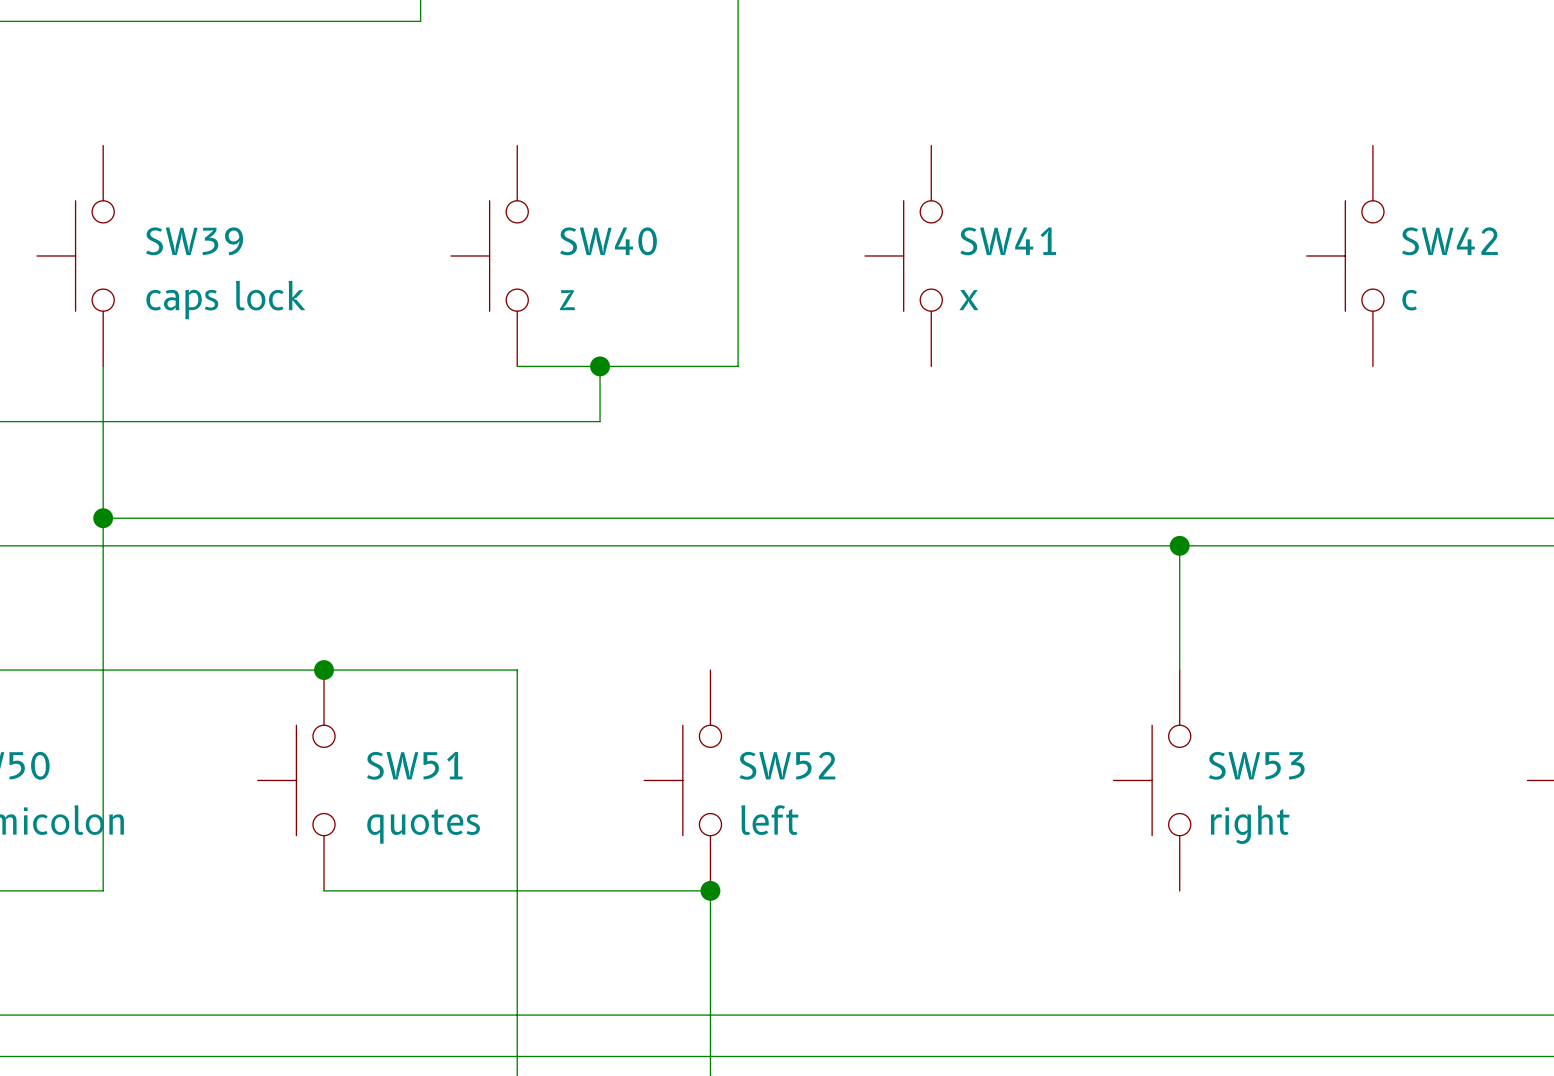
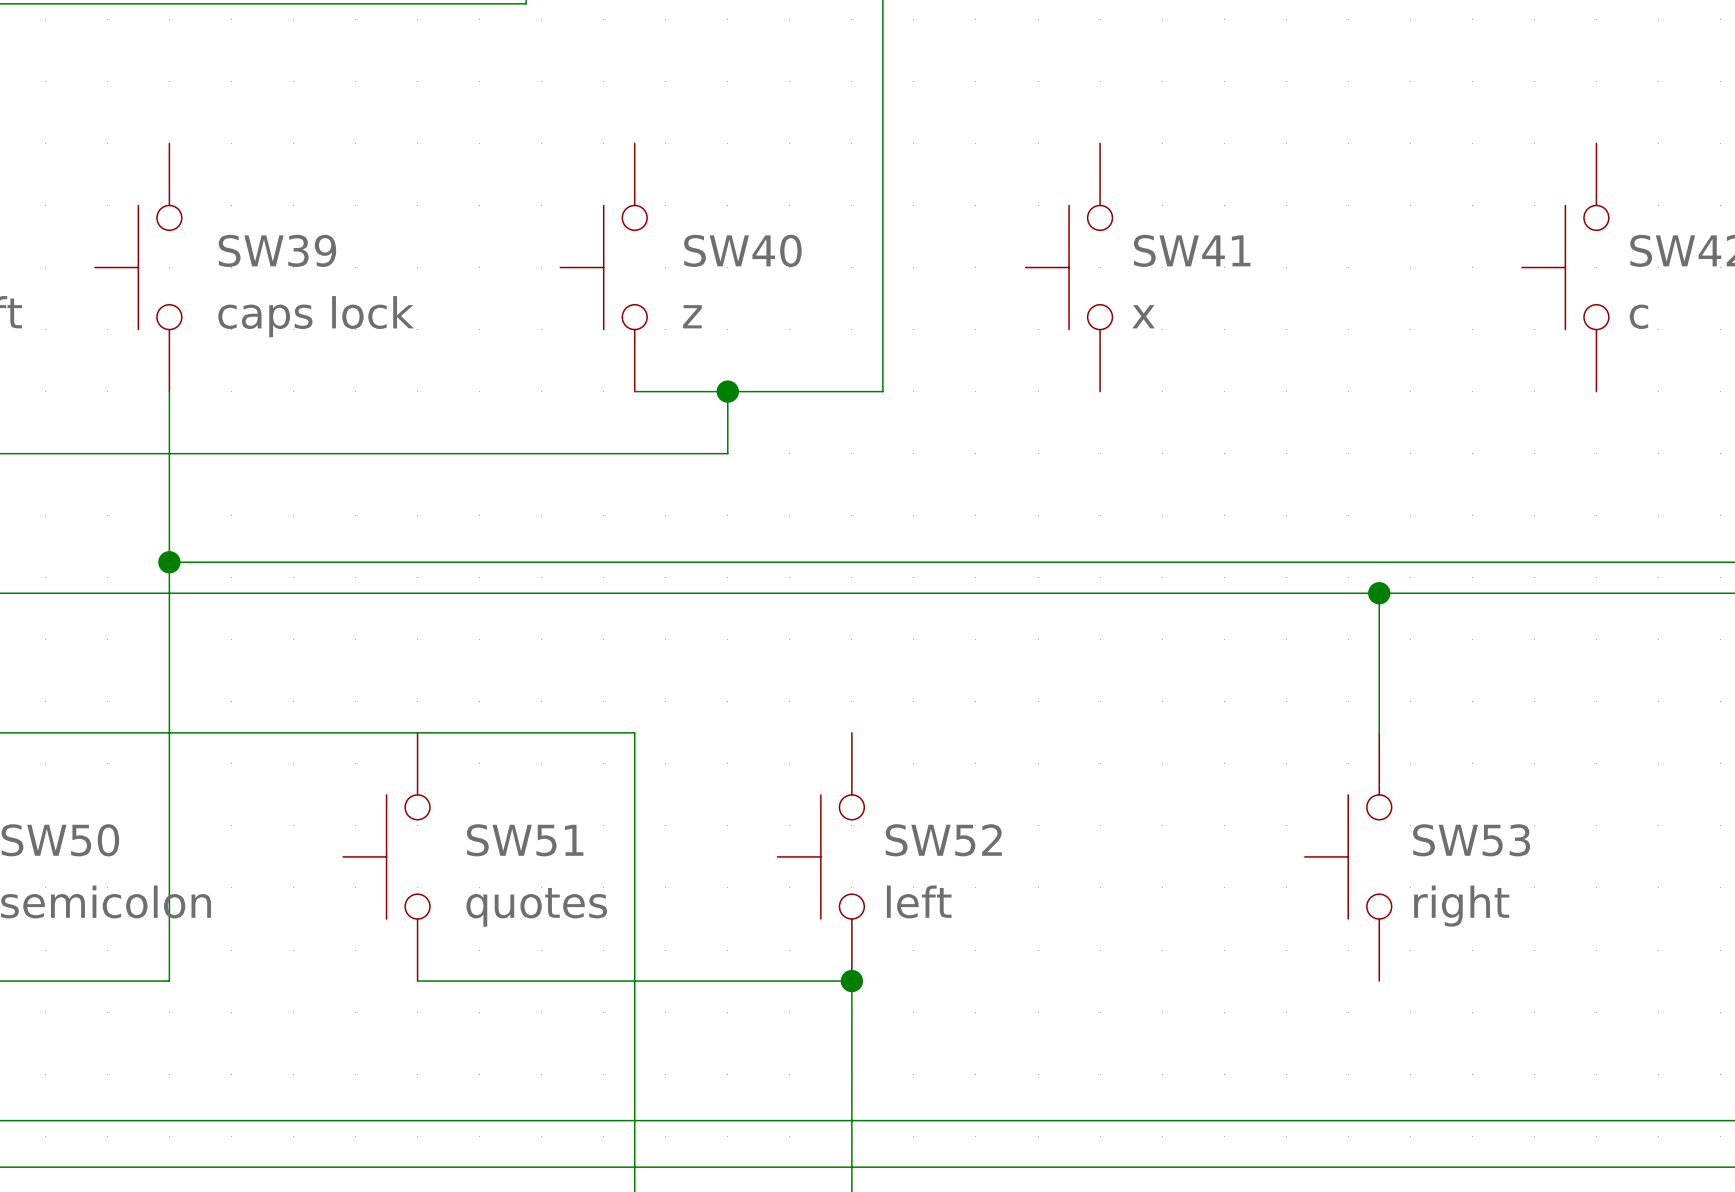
junction: (324, 670) -> none

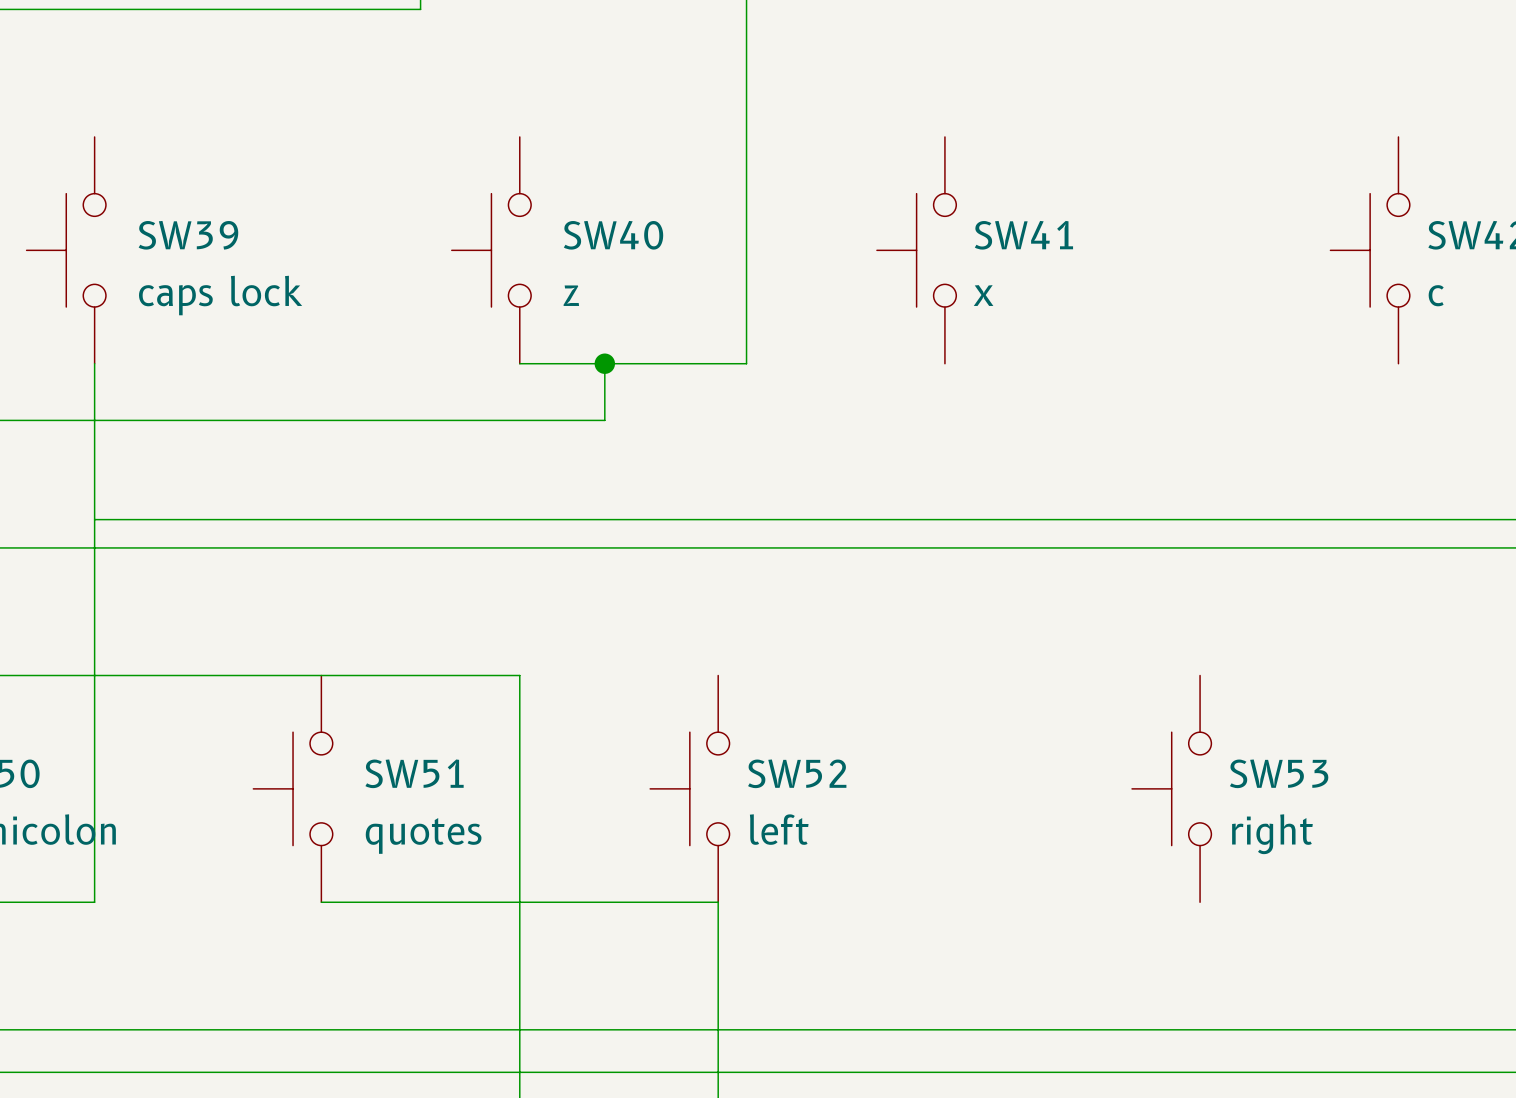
junction: (169, 562) -> none
wire: (1379, 593) (1379, 732) -> none
junction: (1379, 593) -> none
junction: (851, 981) -> none

